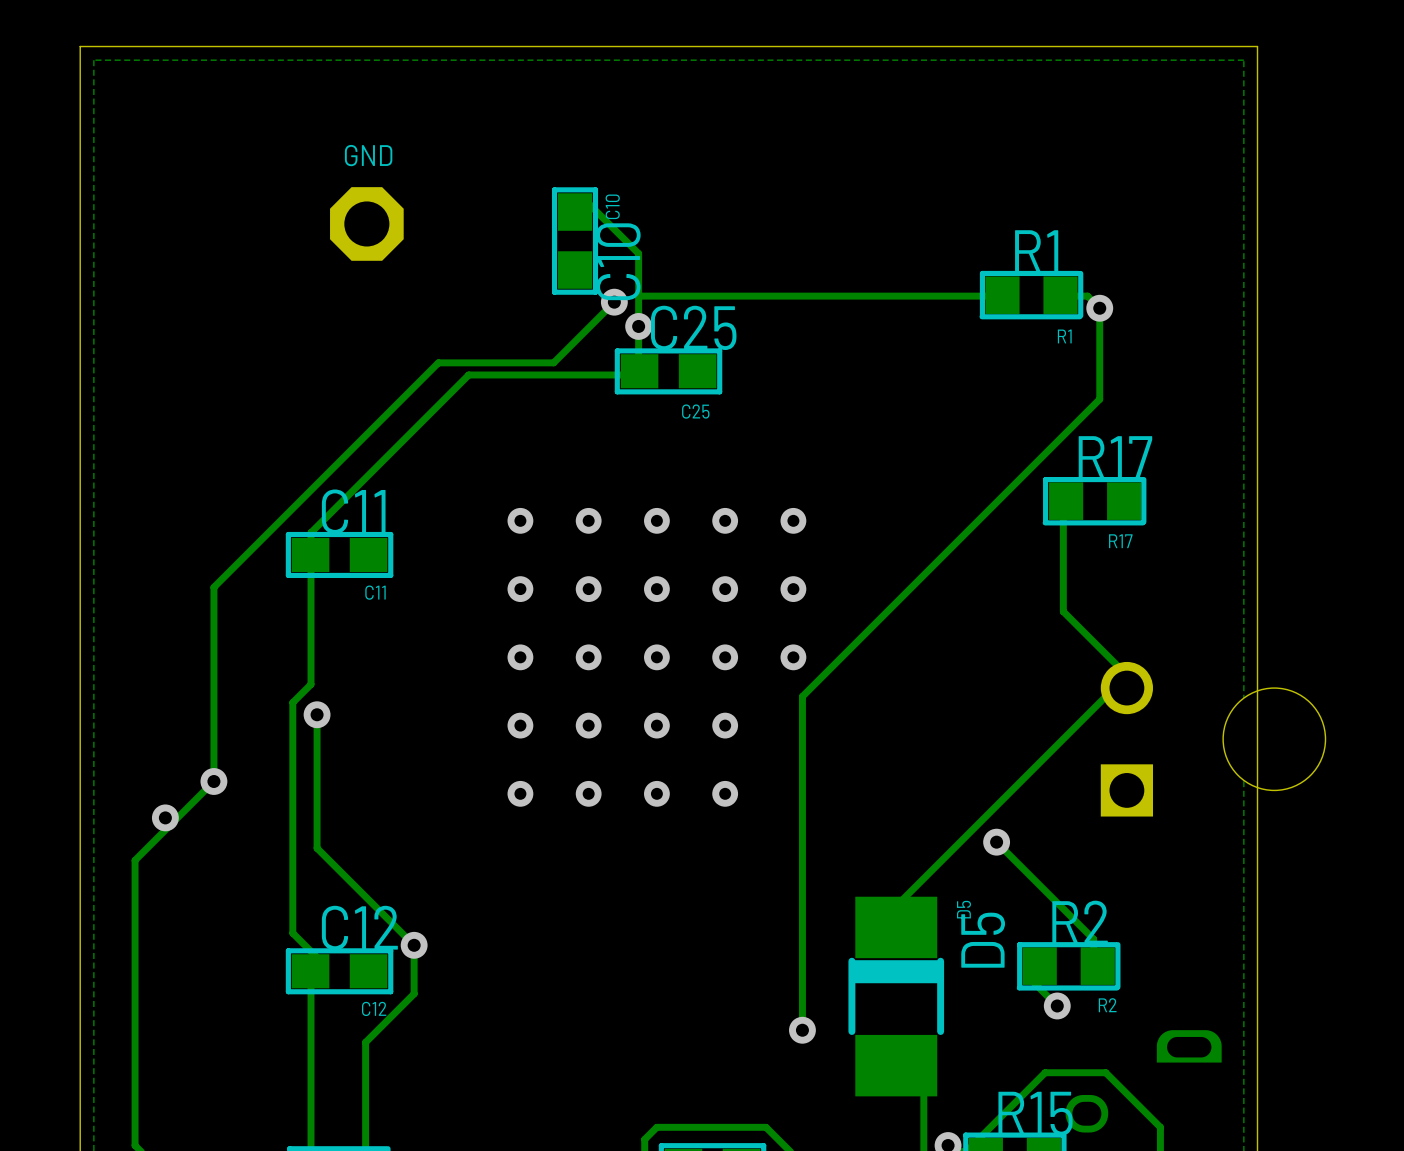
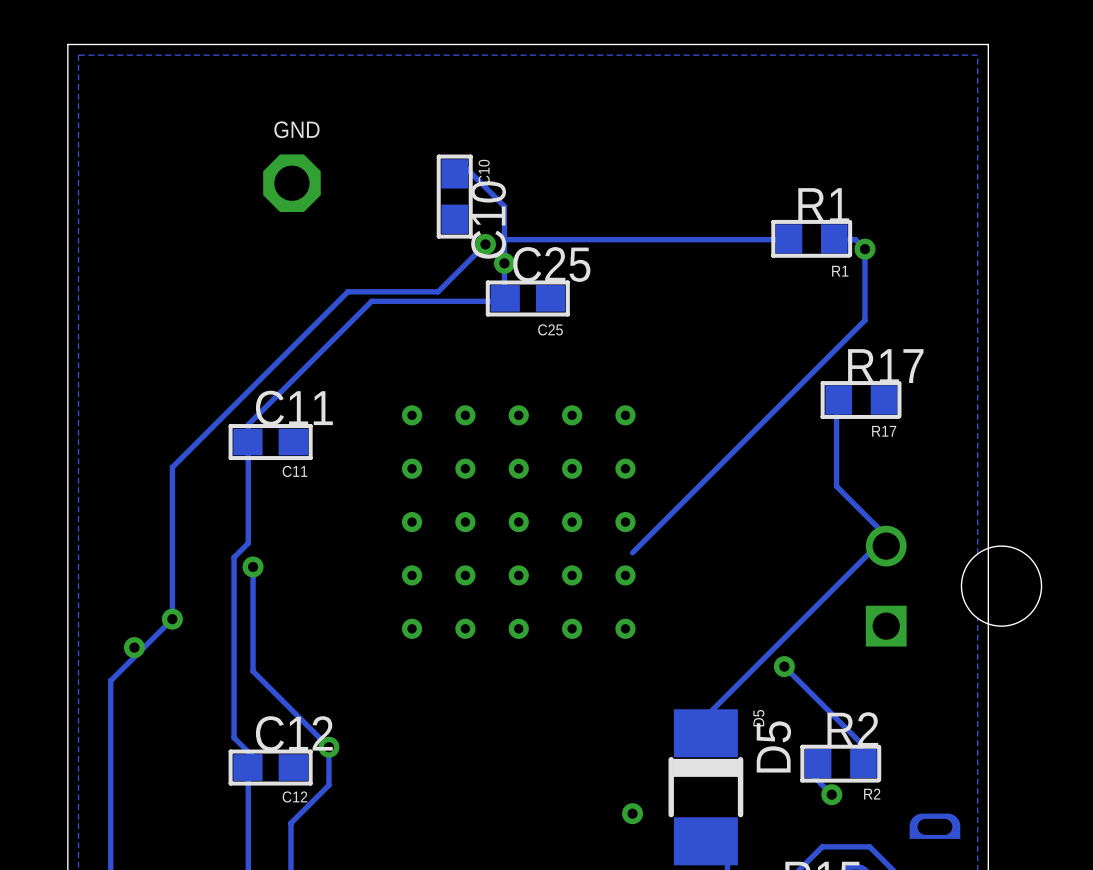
track: (802, 696) (802, 1030) -> none
via: none -> (625, 575)
via: none -> (625, 628)

